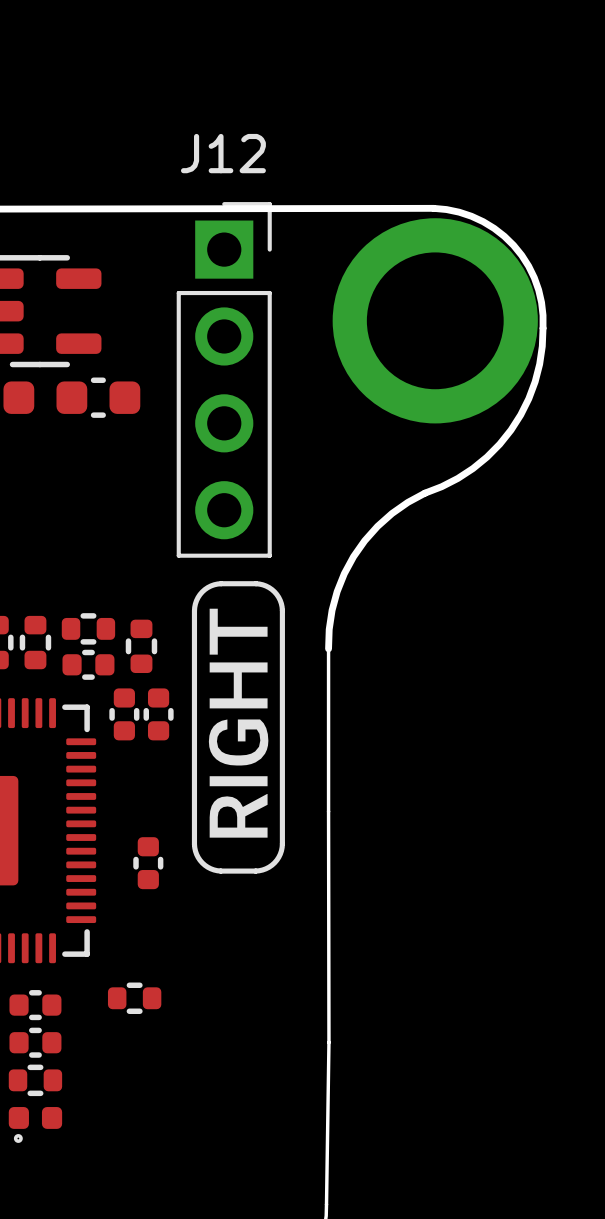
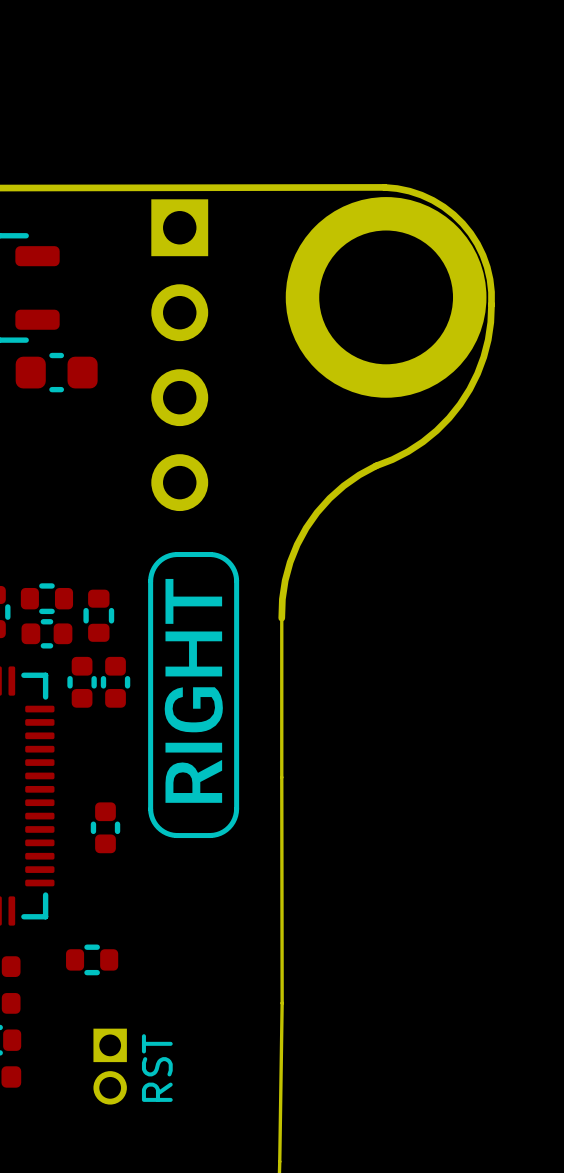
J12: (224, 379) -> none
part: none -> (110, 1066)
text: none -> RST (157, 1068)

